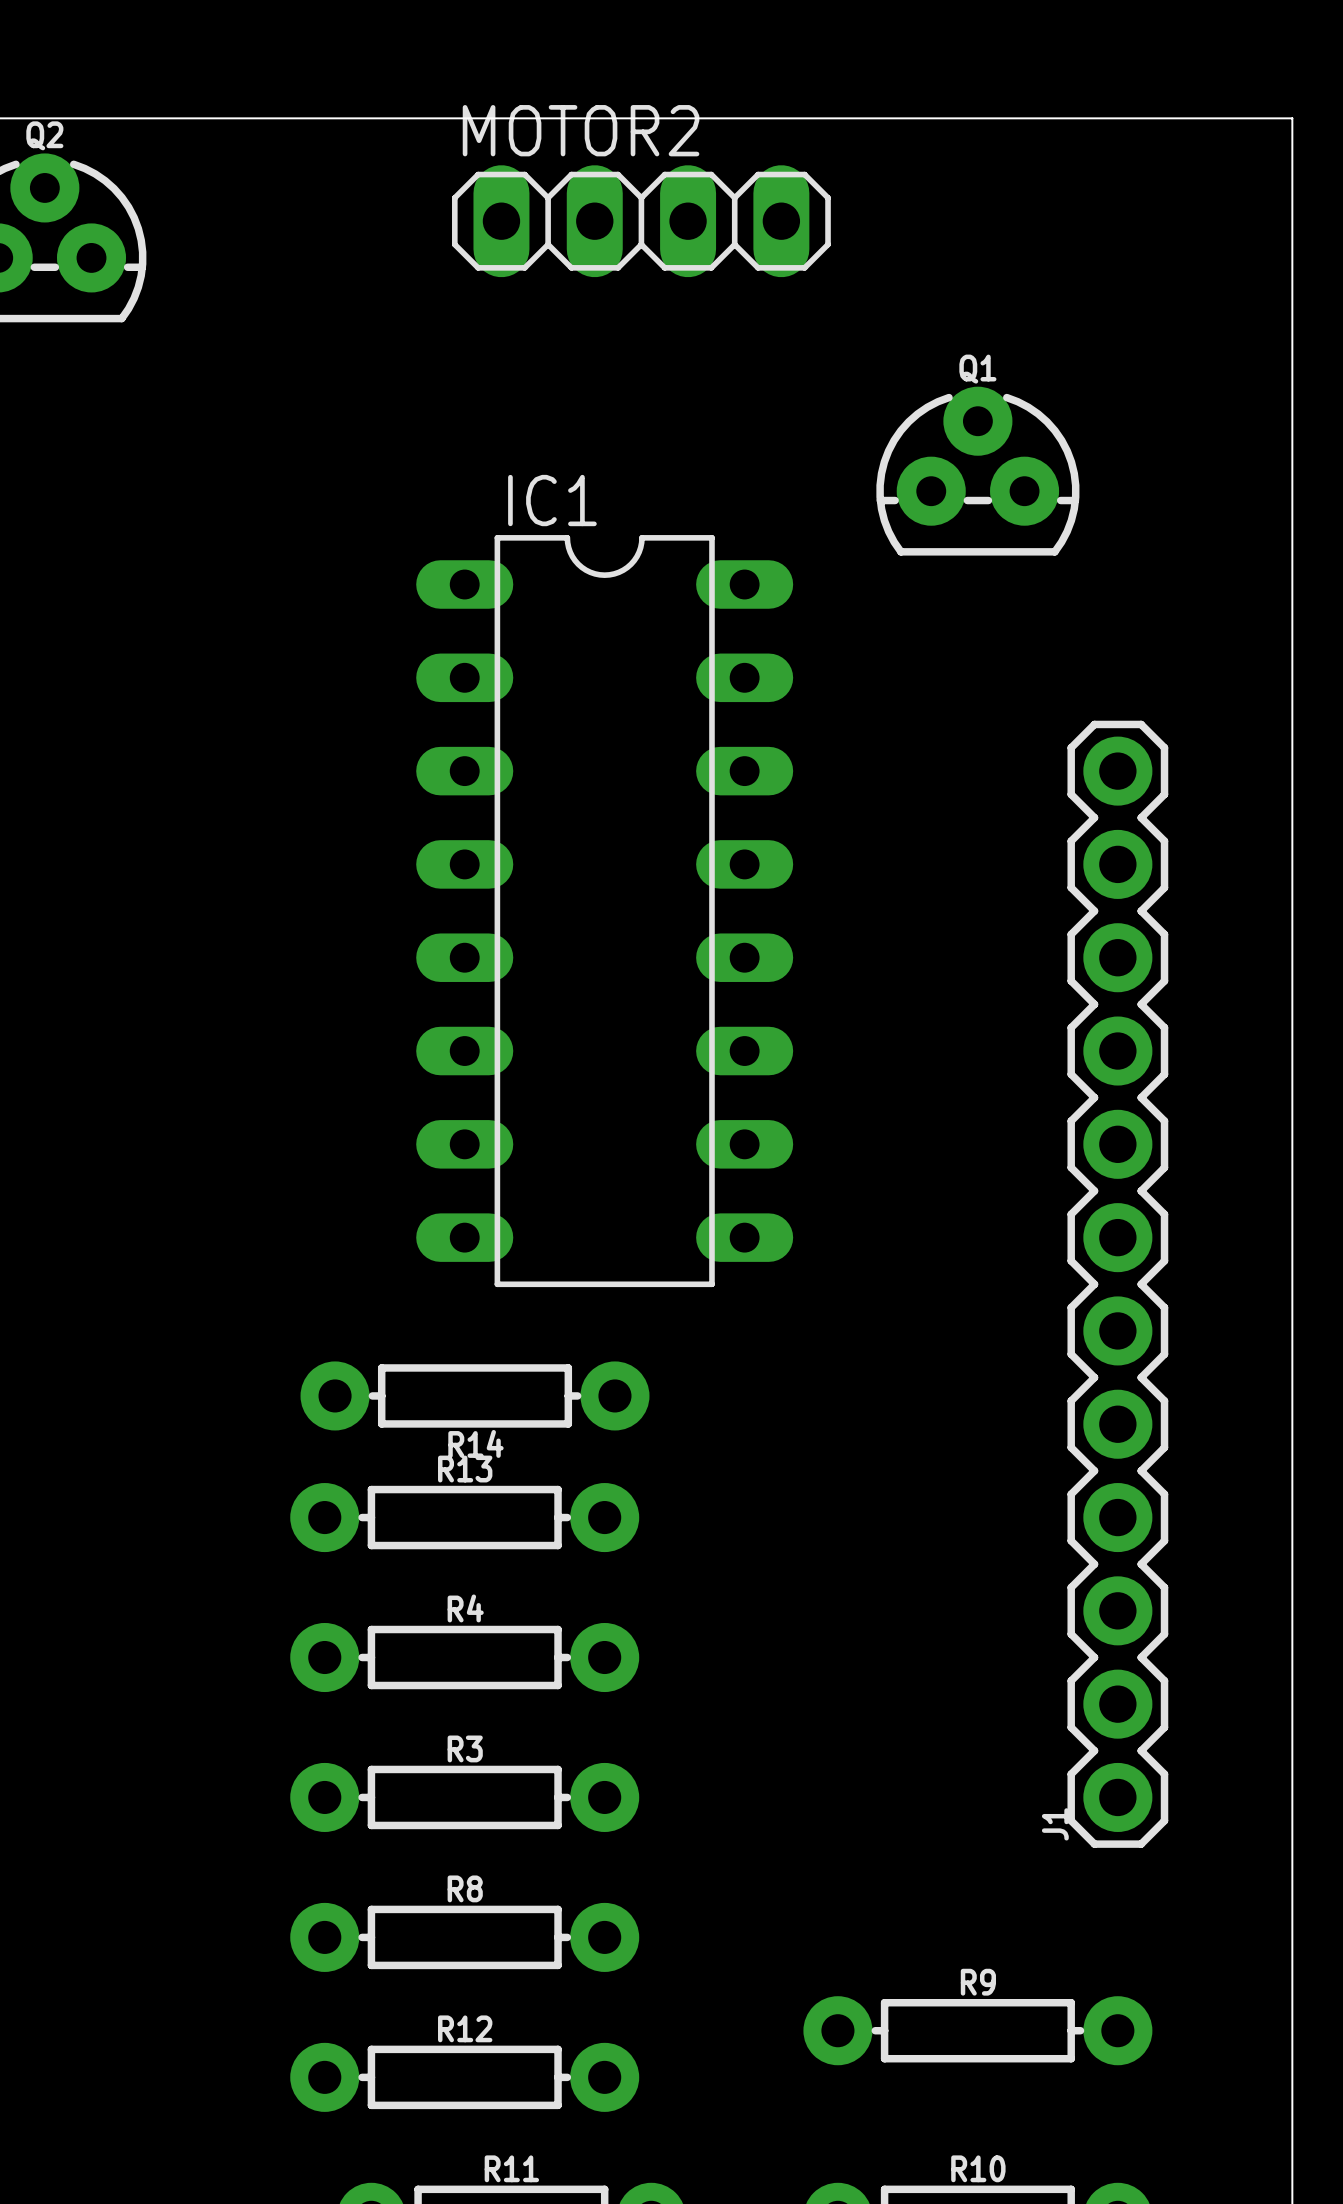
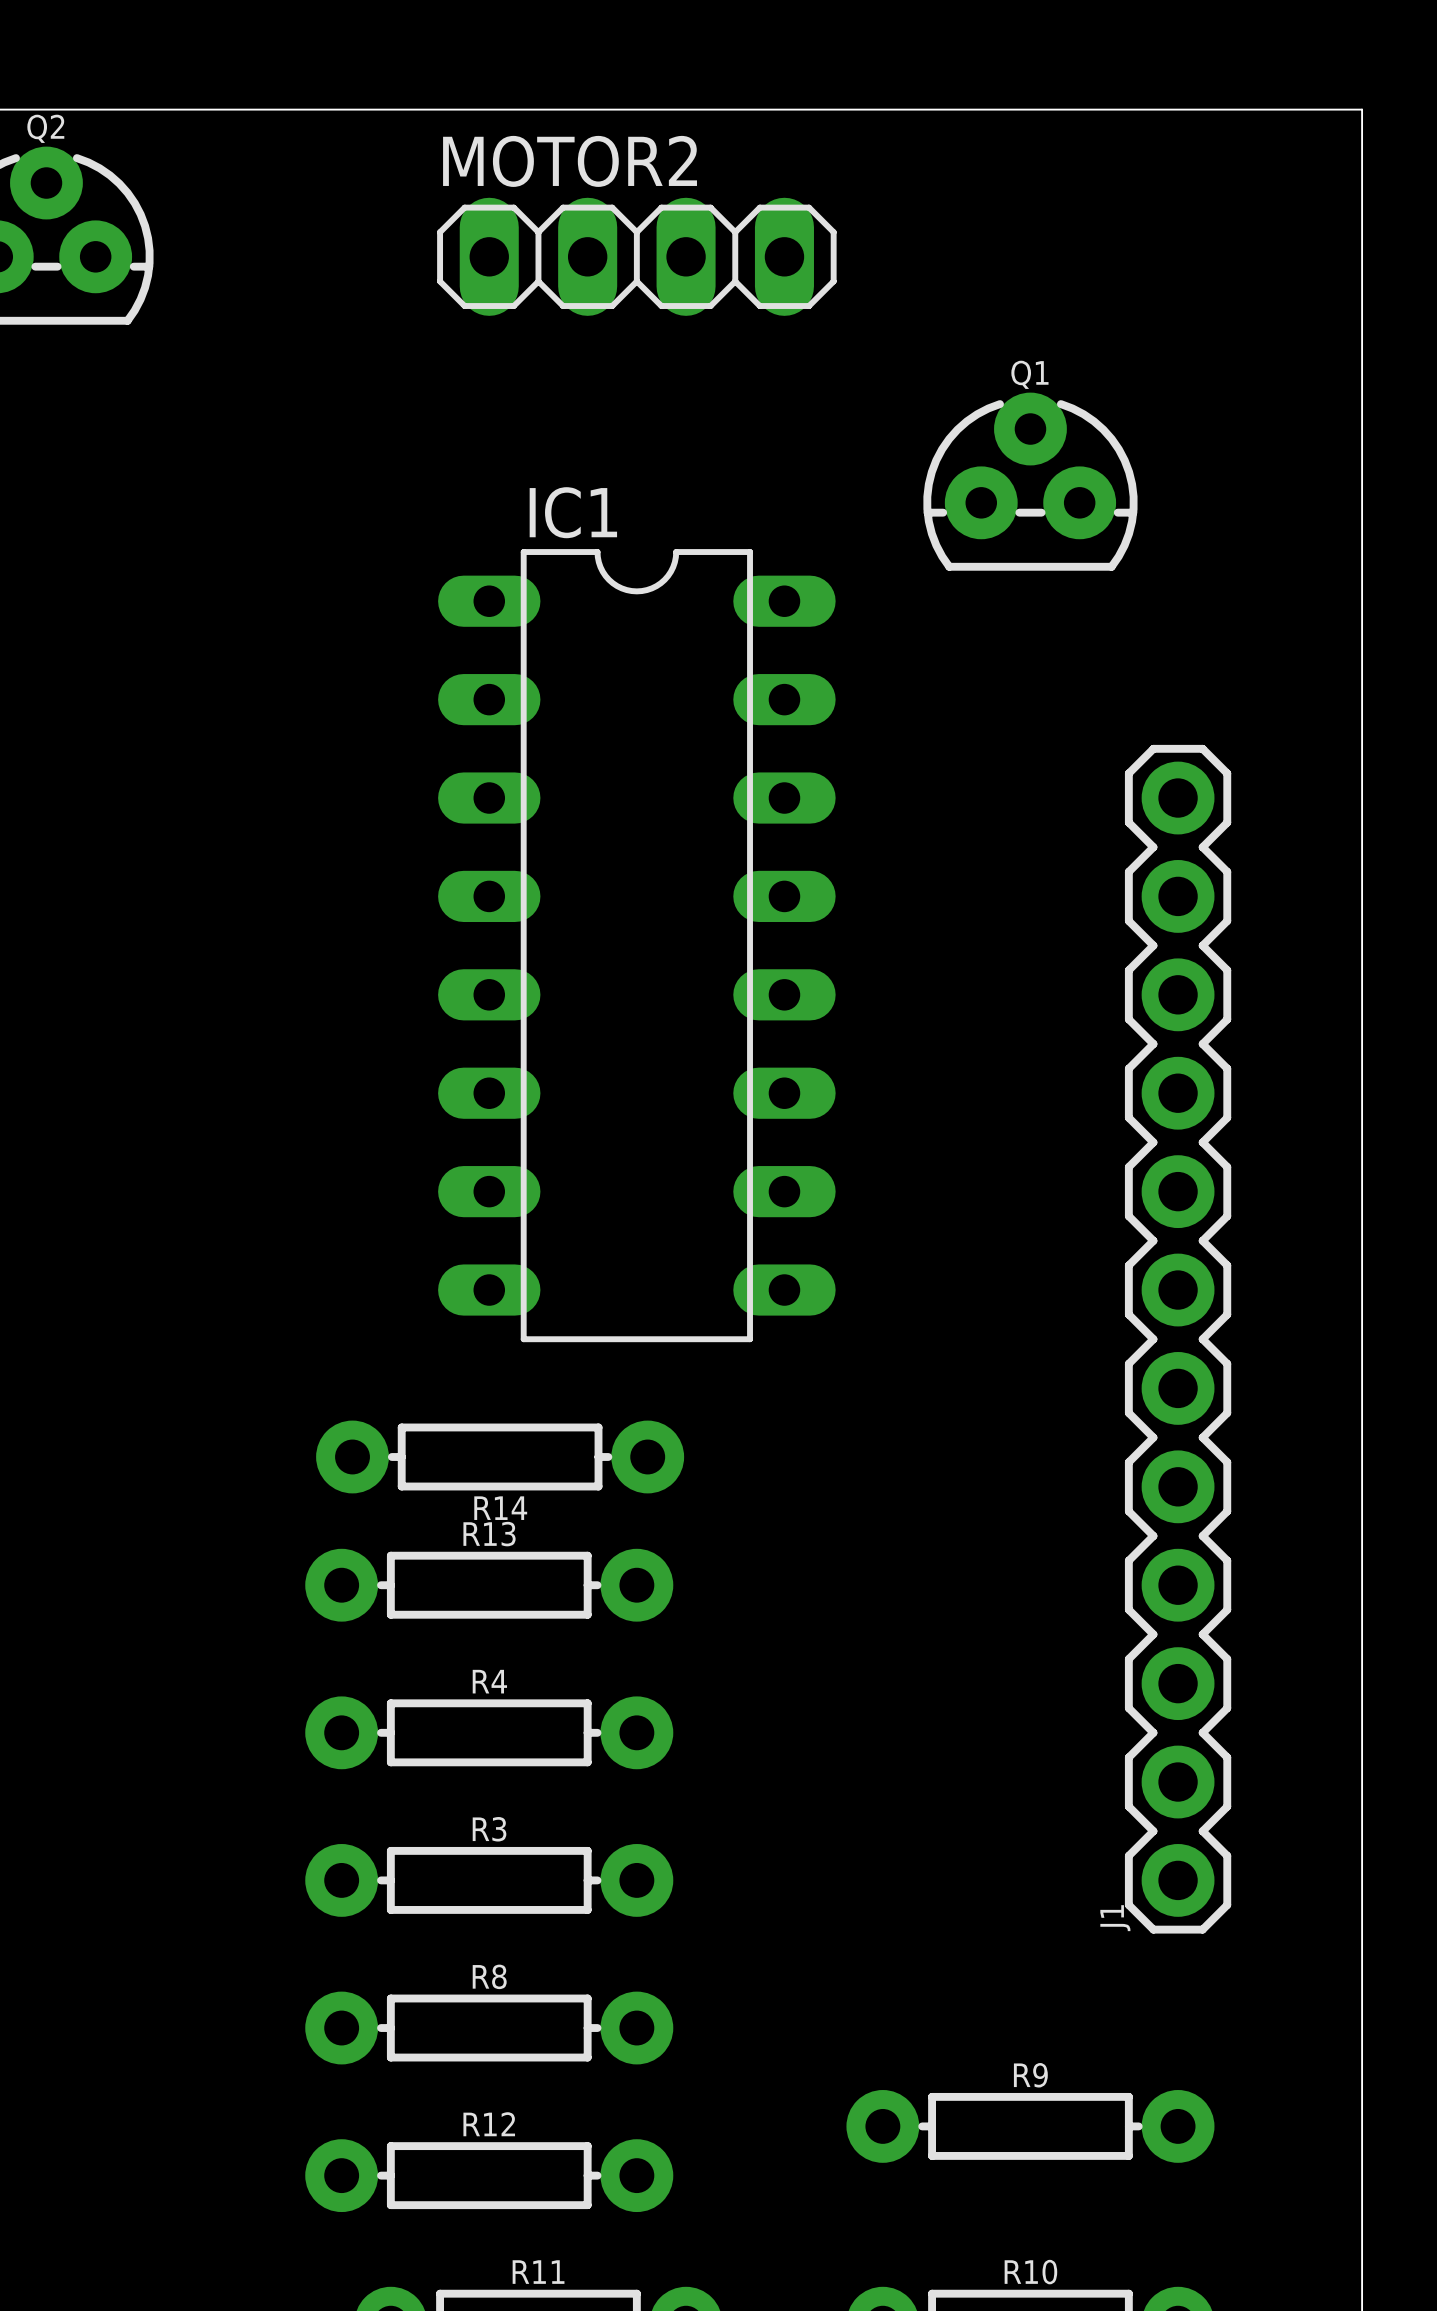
MOTOR2 position: (641, 221) -> (636, 256)

